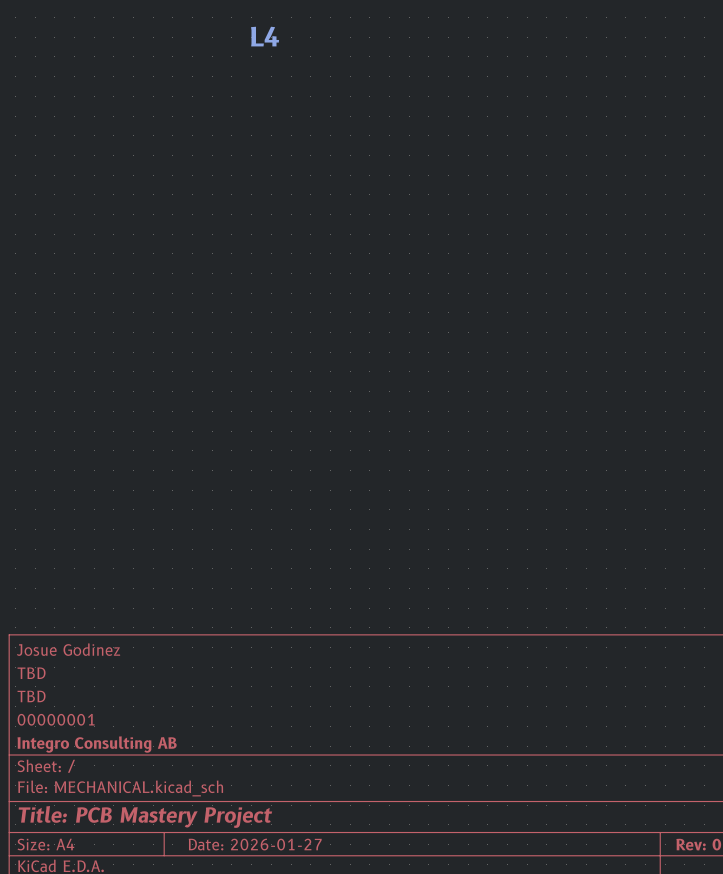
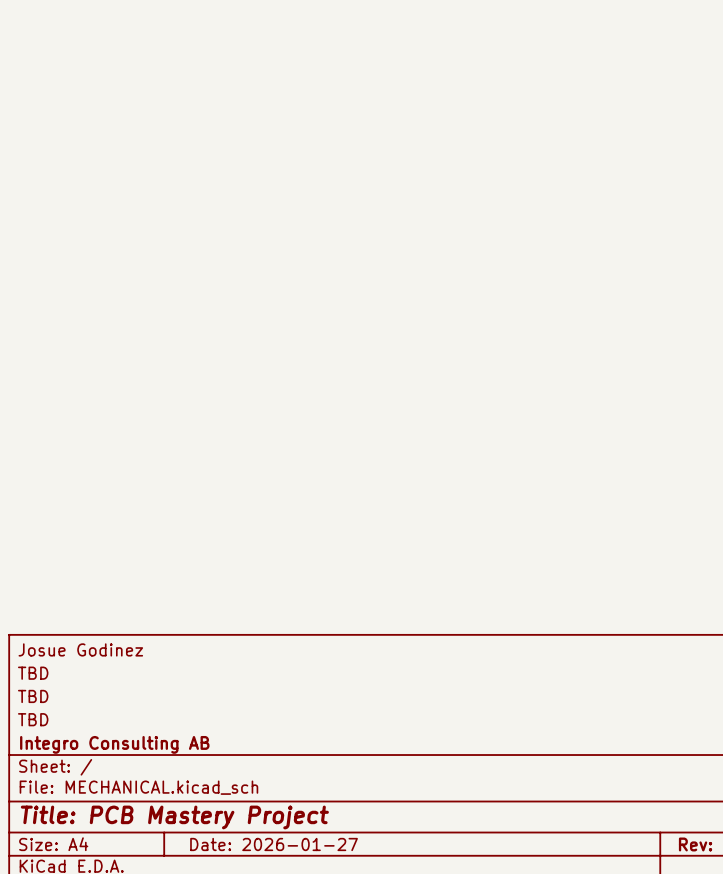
text: L4 (265, 36) -> none
title block: 00000001 (56, 719) -> TBD (33, 719)

